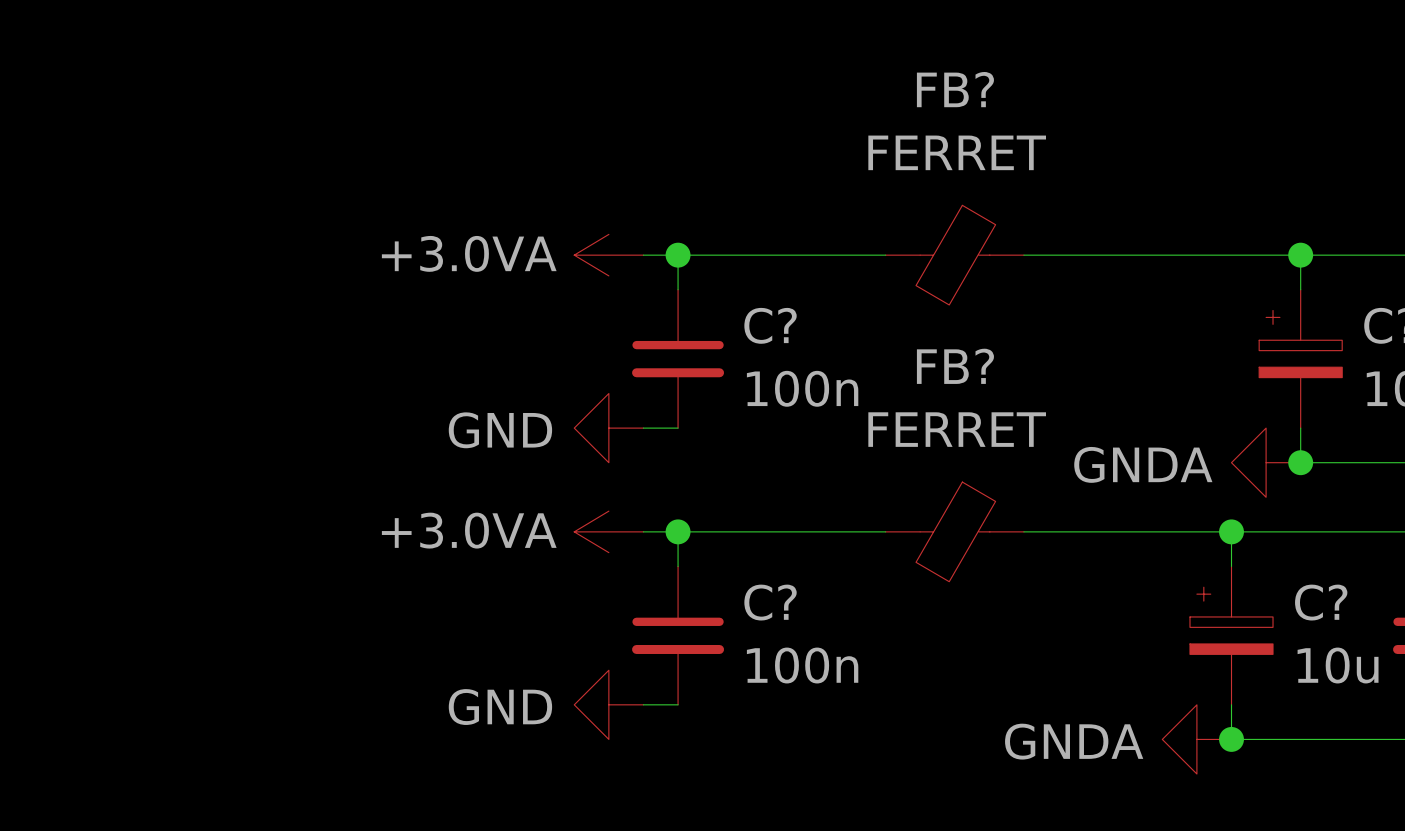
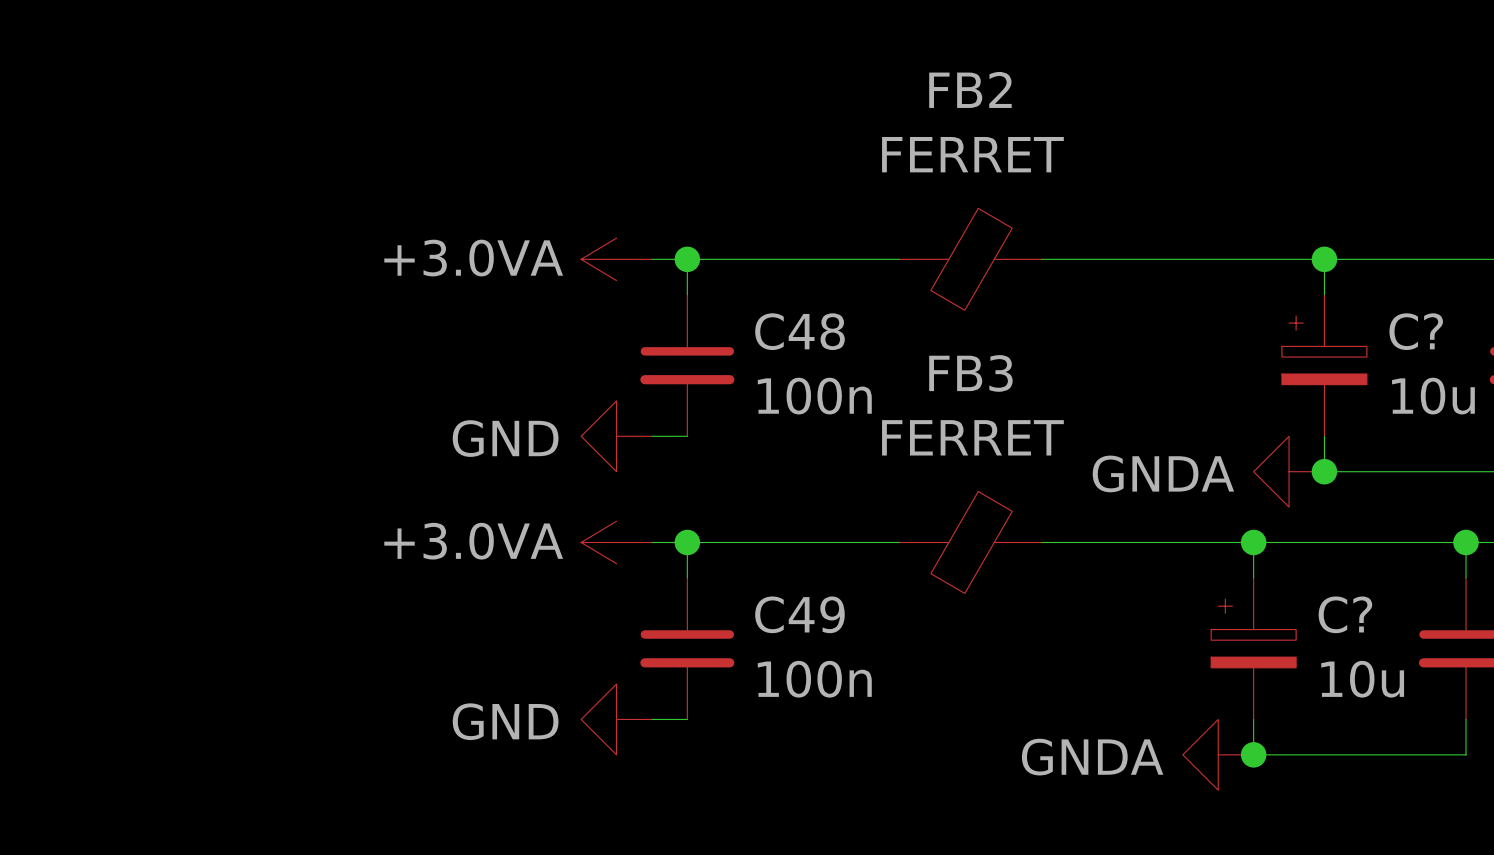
FB? name: FB? (955, 89) -> FB2 (970, 89)
C? name: C? (770, 325) -> C48 (800, 331)
FB? name: FB? (955, 366) -> FB3 (970, 373)
C? name: C? (770, 602) -> C49 (799, 614)

